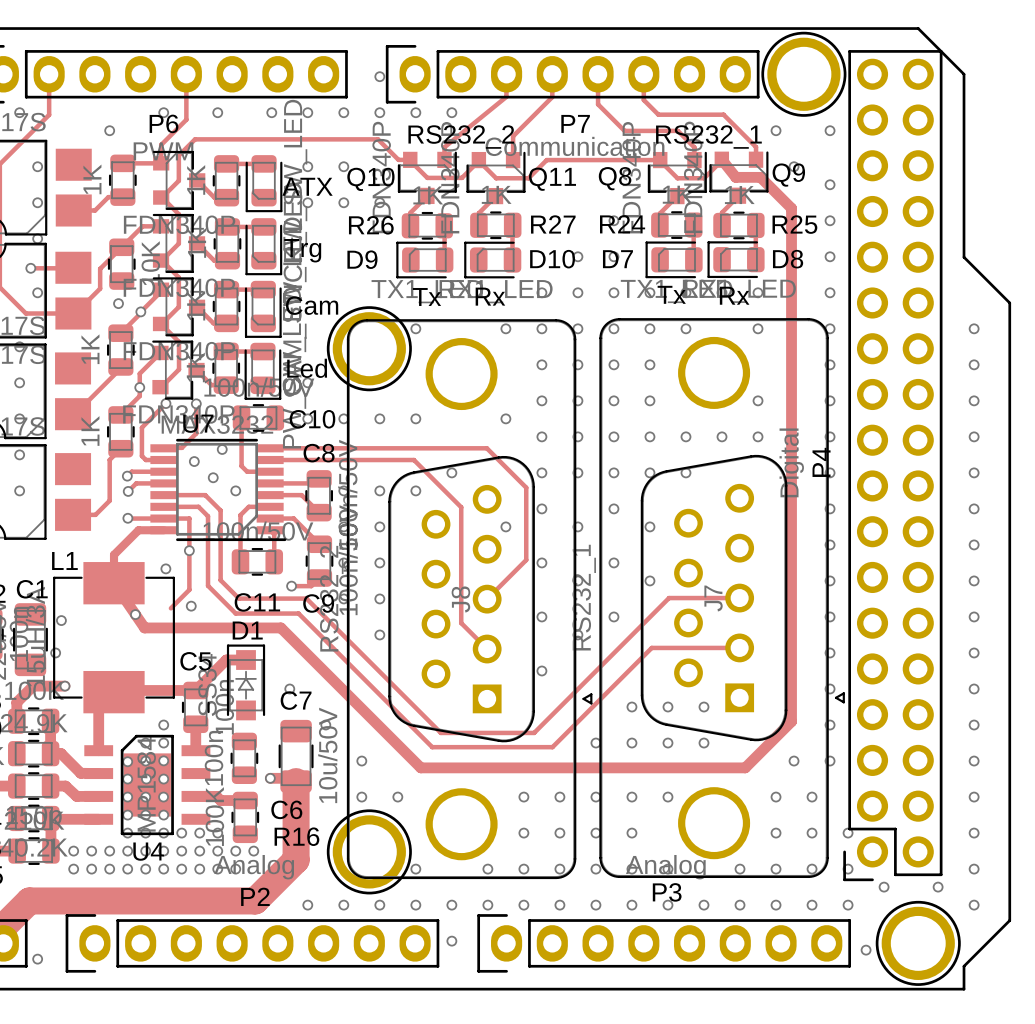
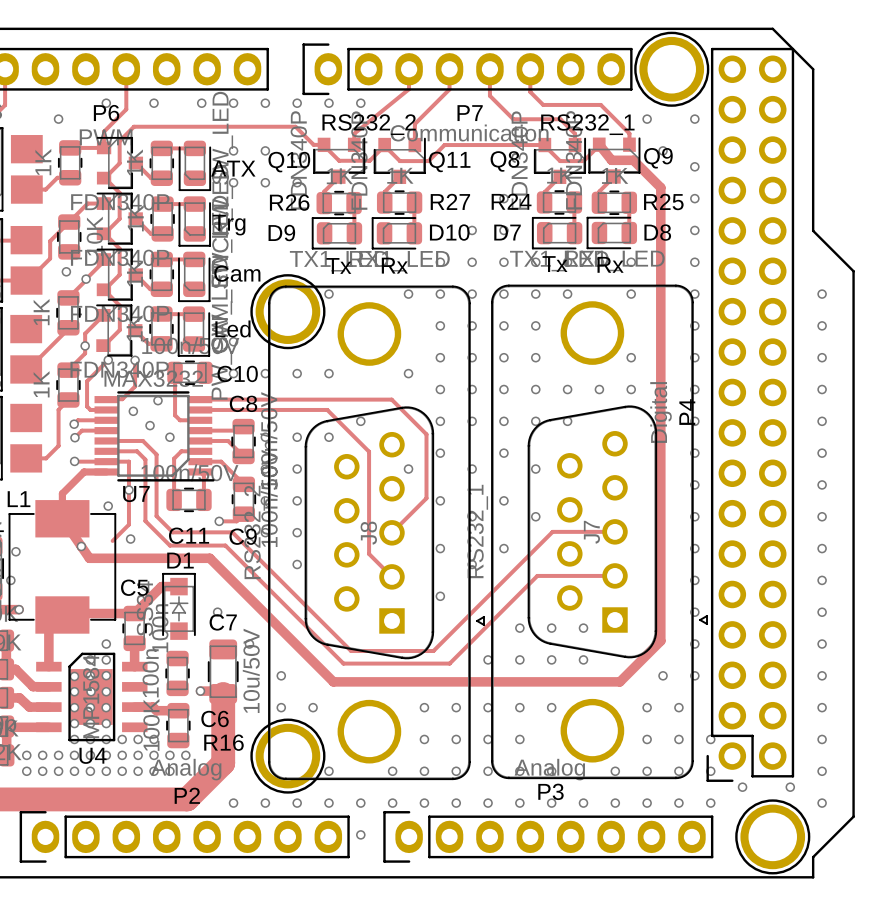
via: (379, 76) -> none
U7 name position: U7 (198, 423) -> U7 (136, 494)
via: (866, 950) -> none

